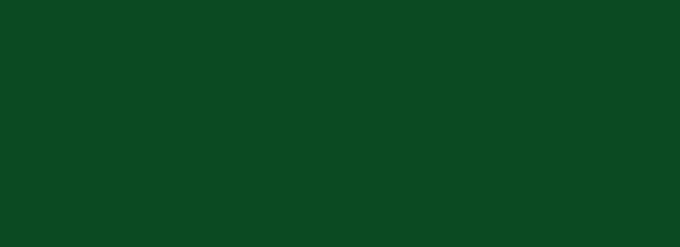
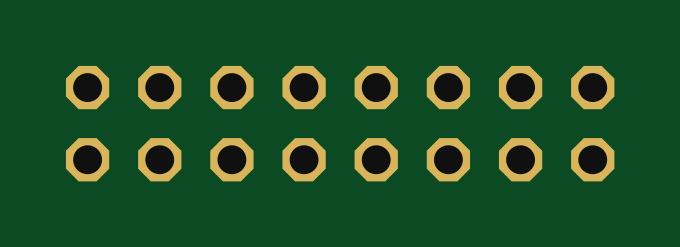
part: none -> (340, 123)

